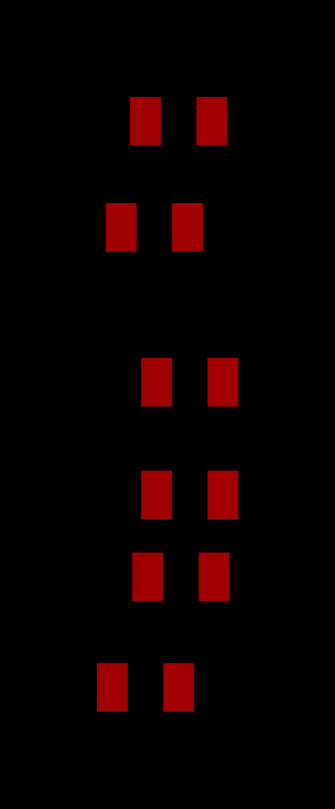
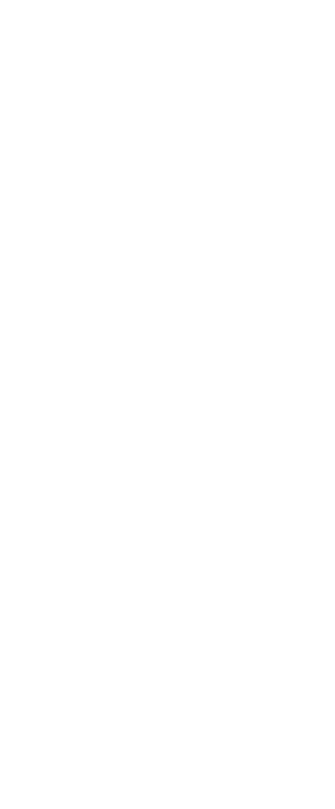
part: (178, 121) -> none
part: (154, 227) -> none
part: (189, 382) -> none
part: (189, 495) -> none
part: (180, 576) -> none
part: (145, 687) -> none

